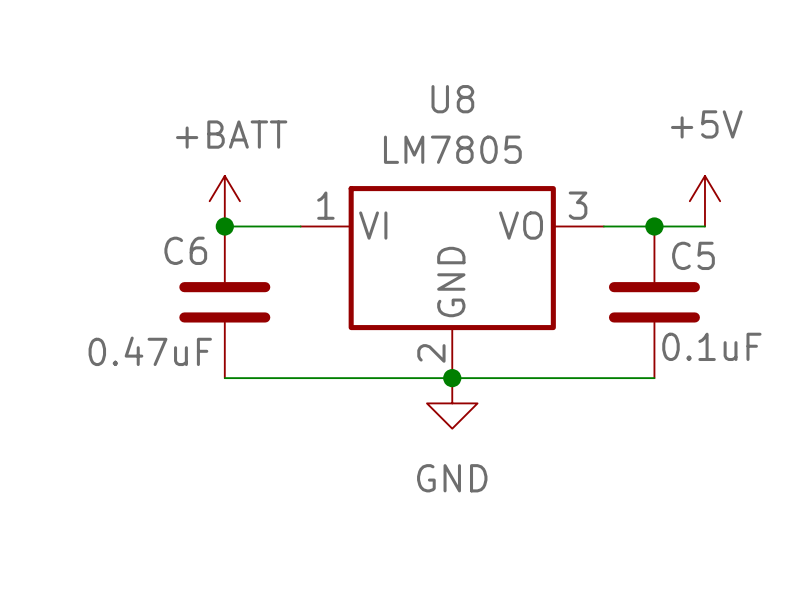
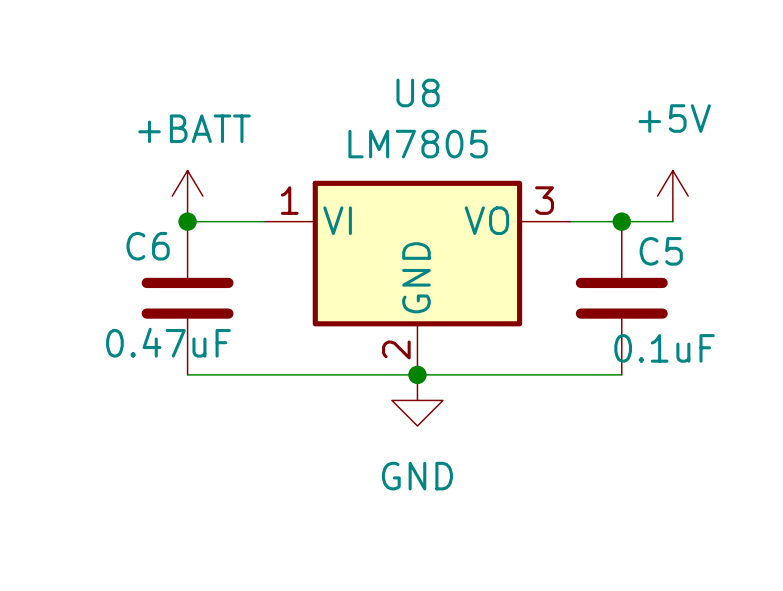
C5 value position: 0.1uF (711, 346) -> 0.1uF (664, 348)
C6 value position: 0.47uF (150, 351) -> 0.47uF (168, 342)

